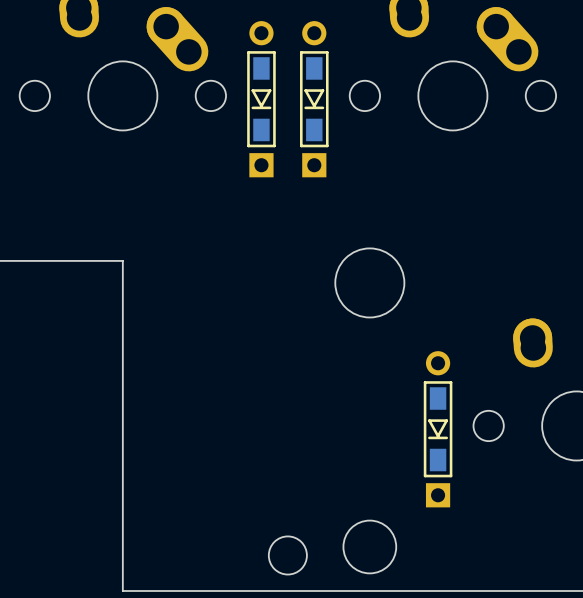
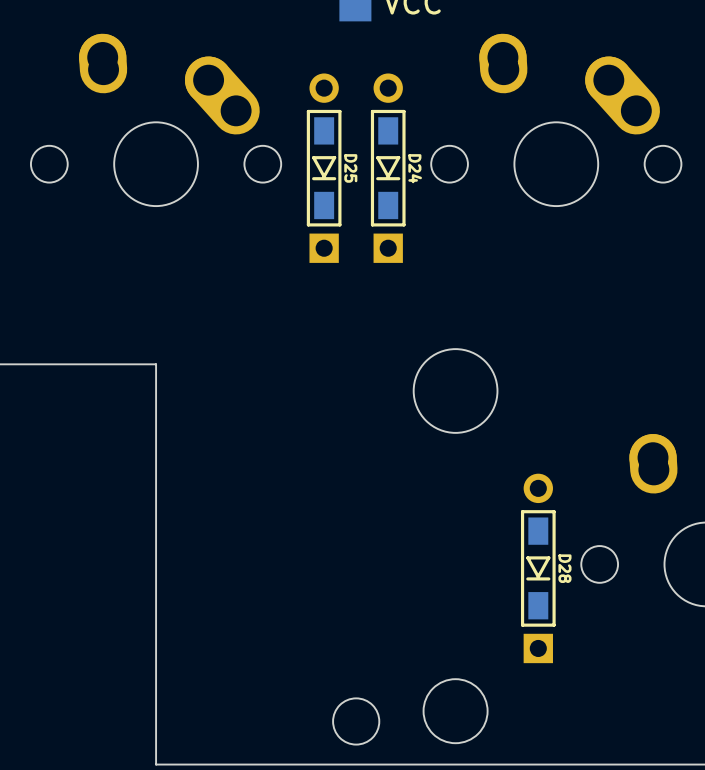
D25 name: none -> D25 (350, 168)
D24 name: none -> D24 (415, 168)
D28 name: none -> D28 (564, 568)

